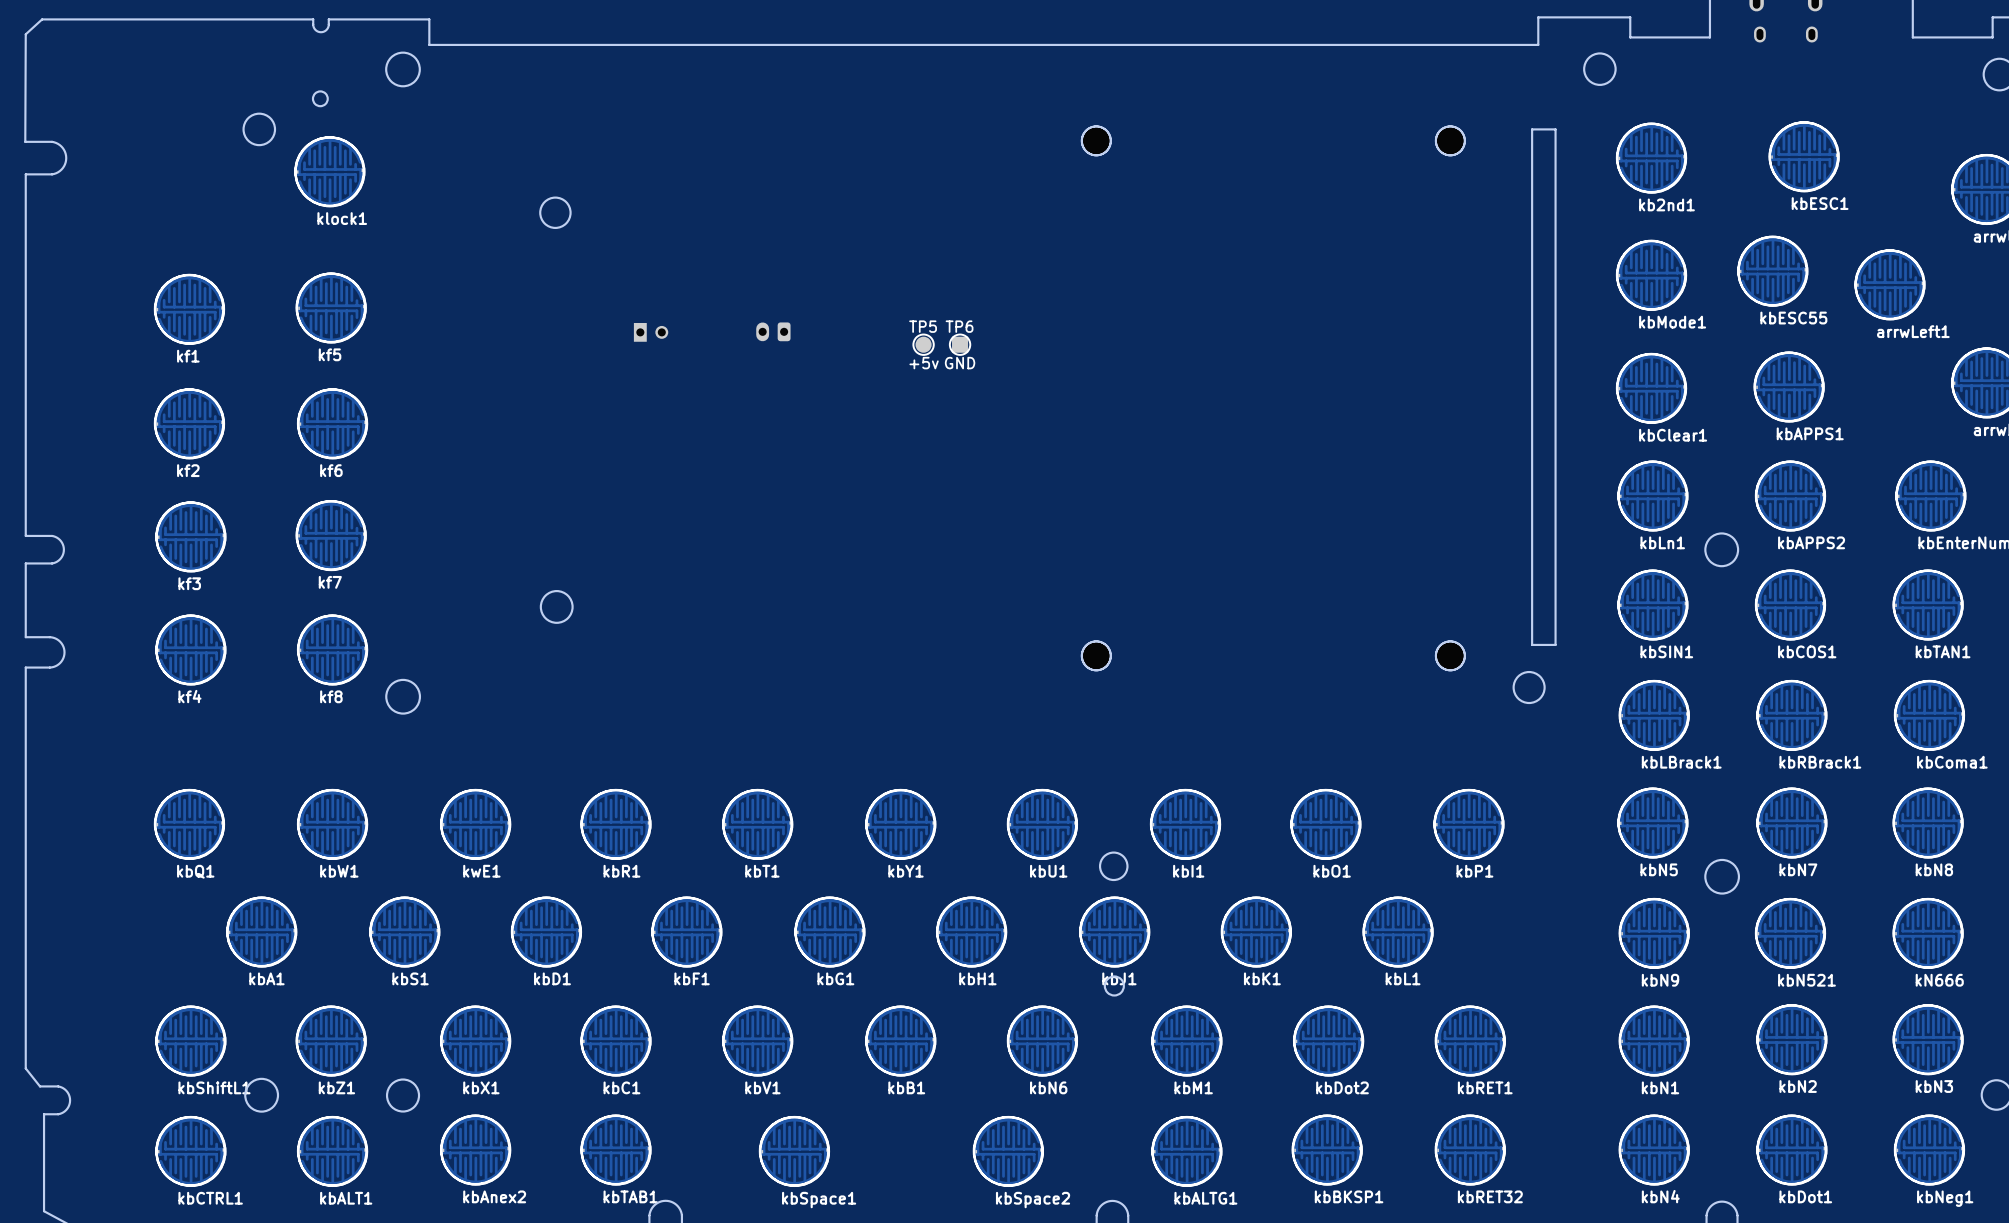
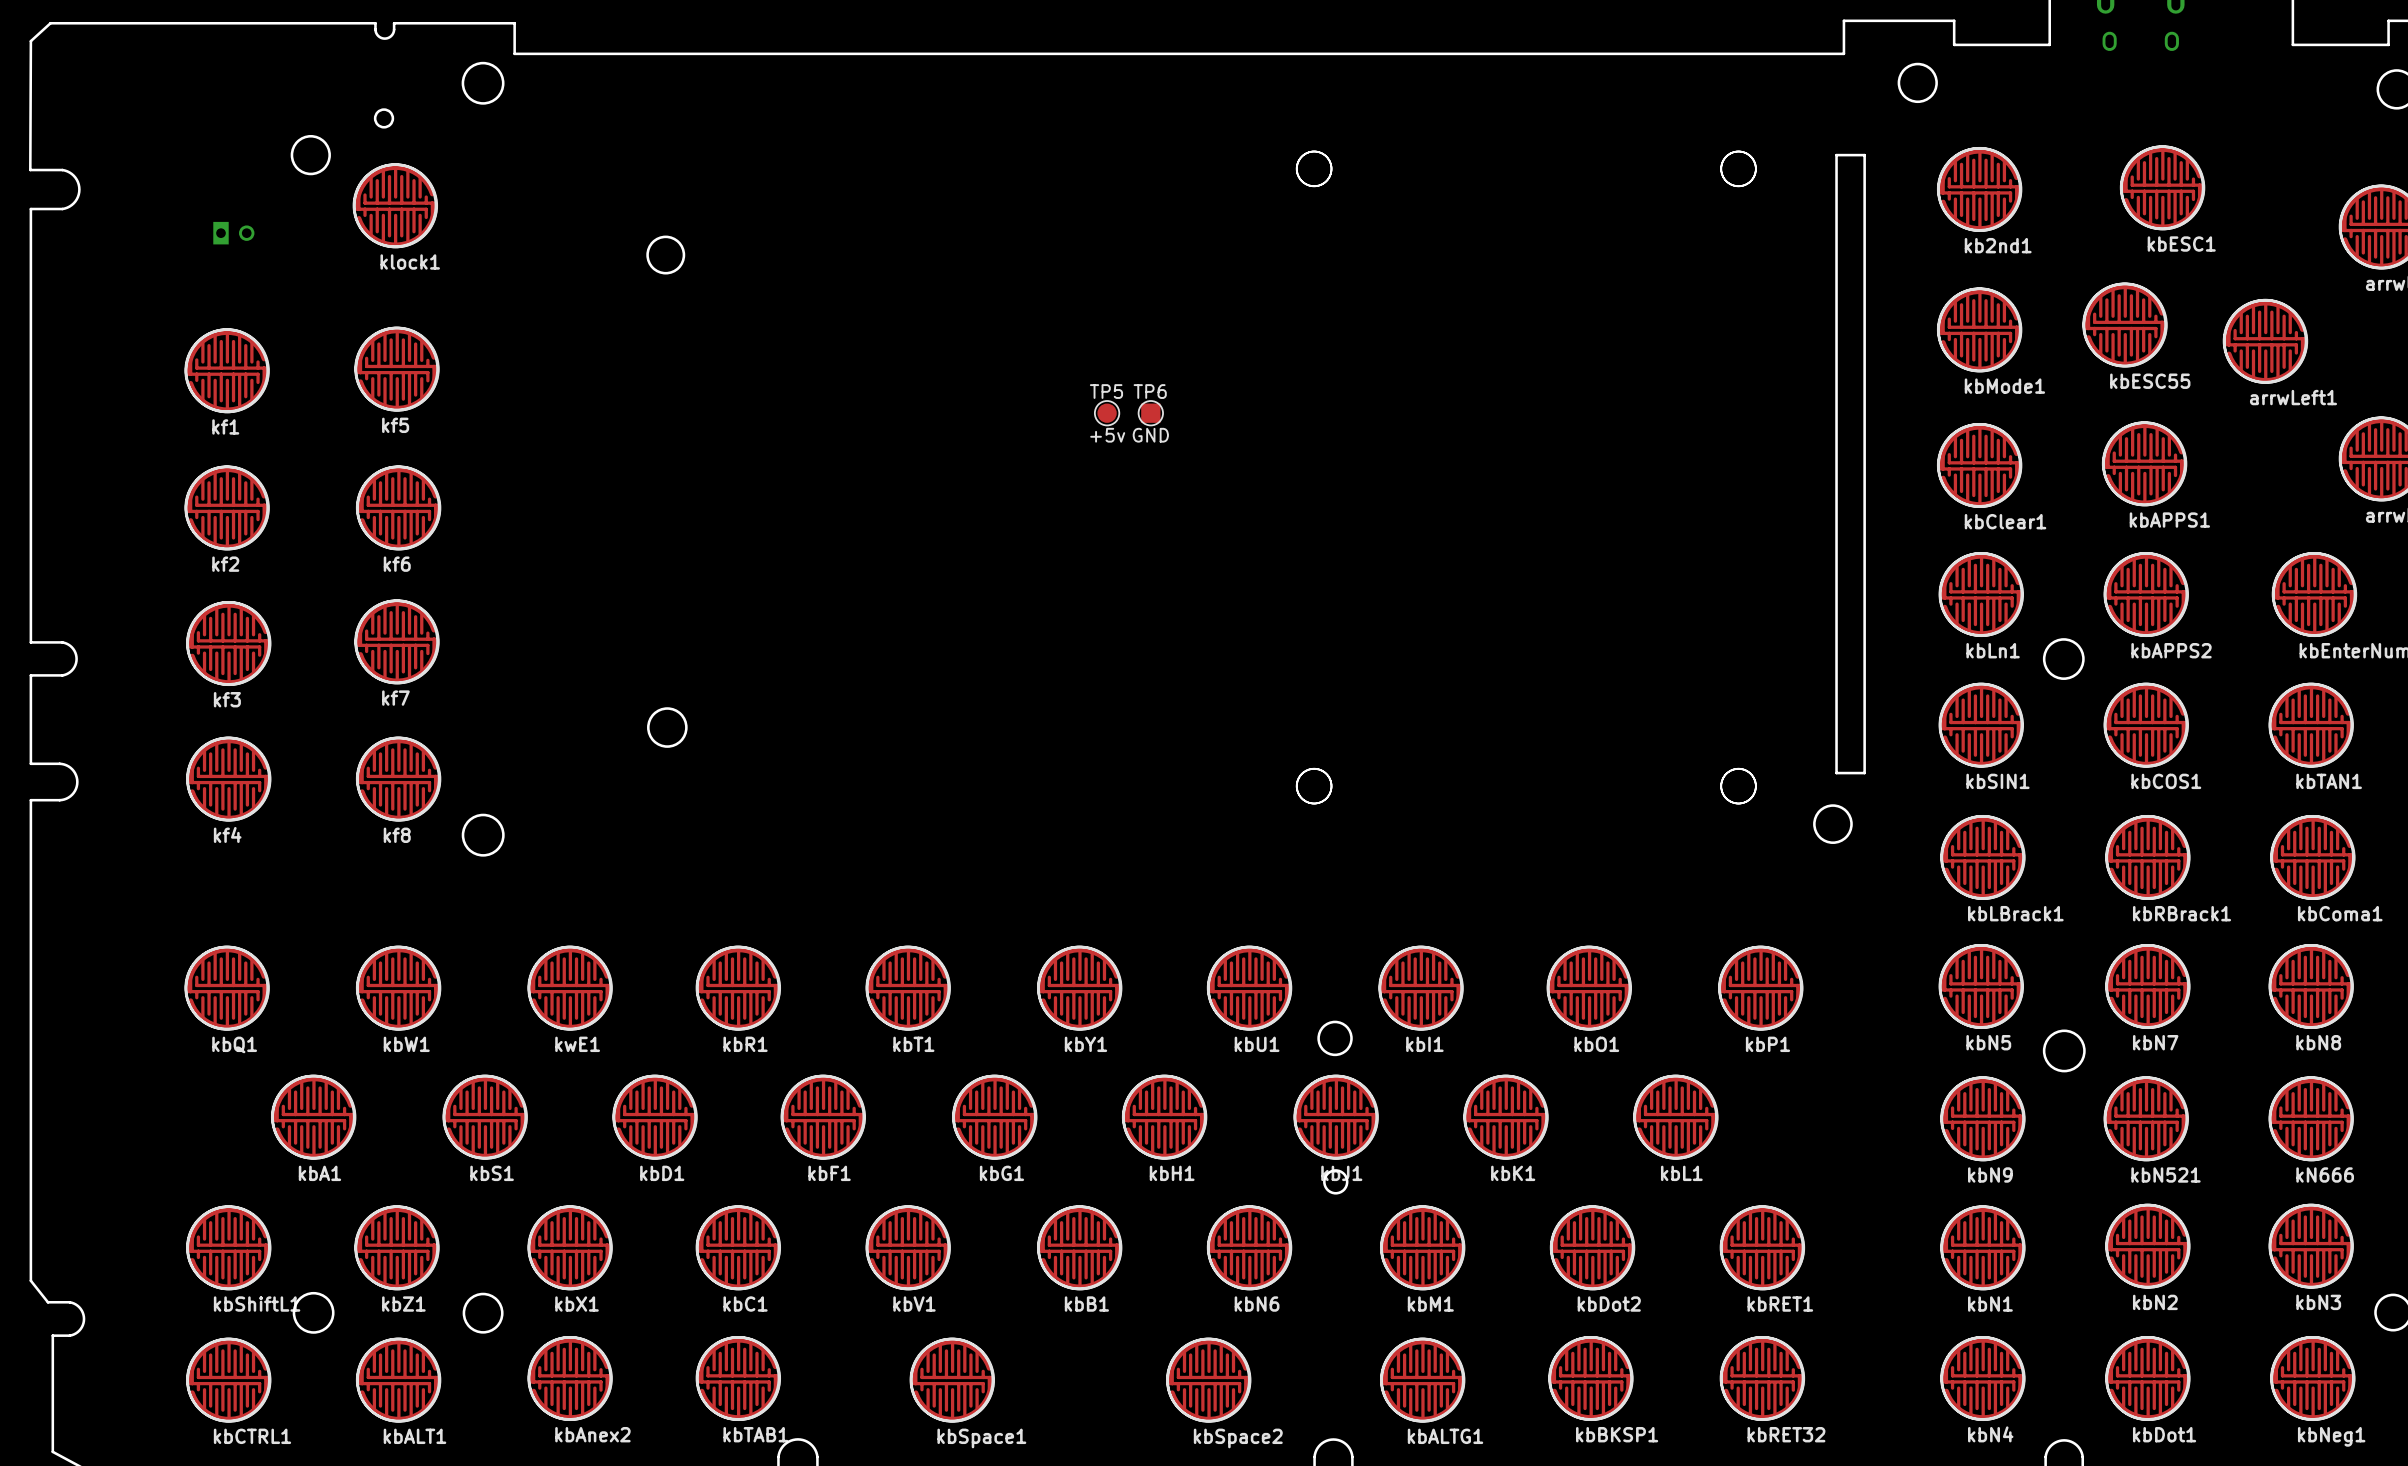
part: none -> (233, 233)
part: (773, 331) -> none
part: (651, 332) -> none

